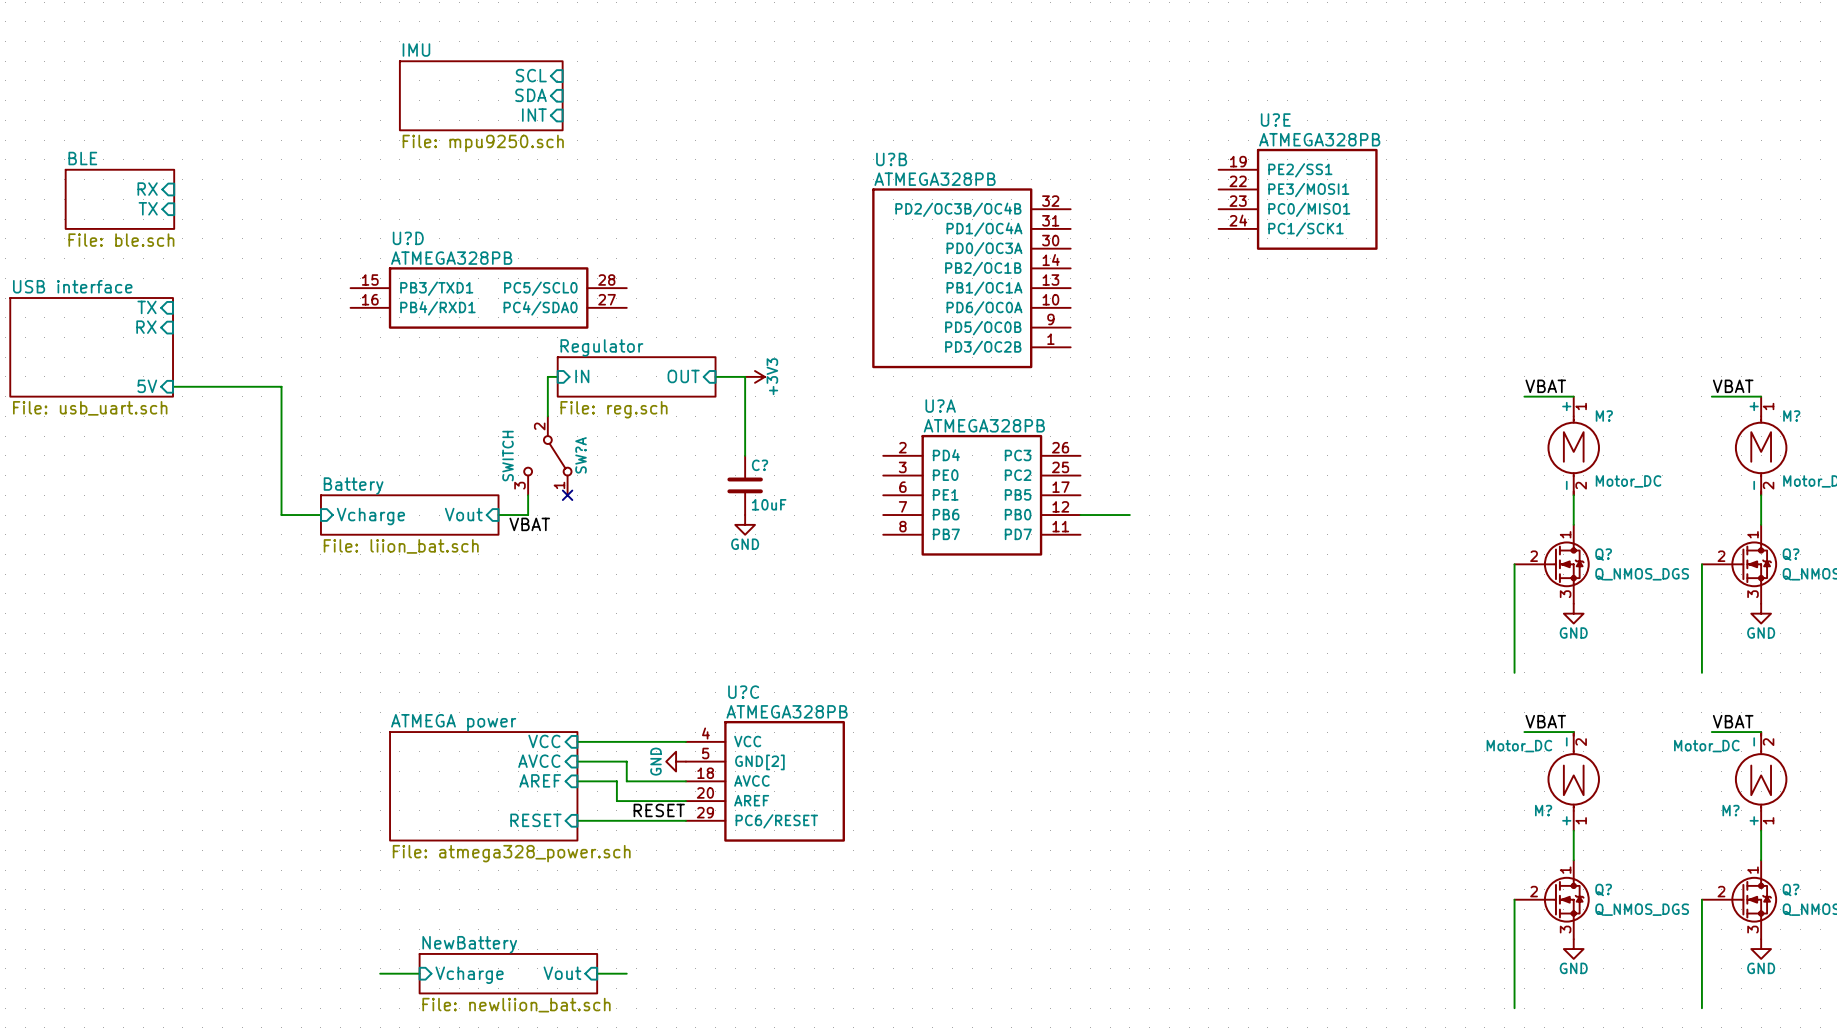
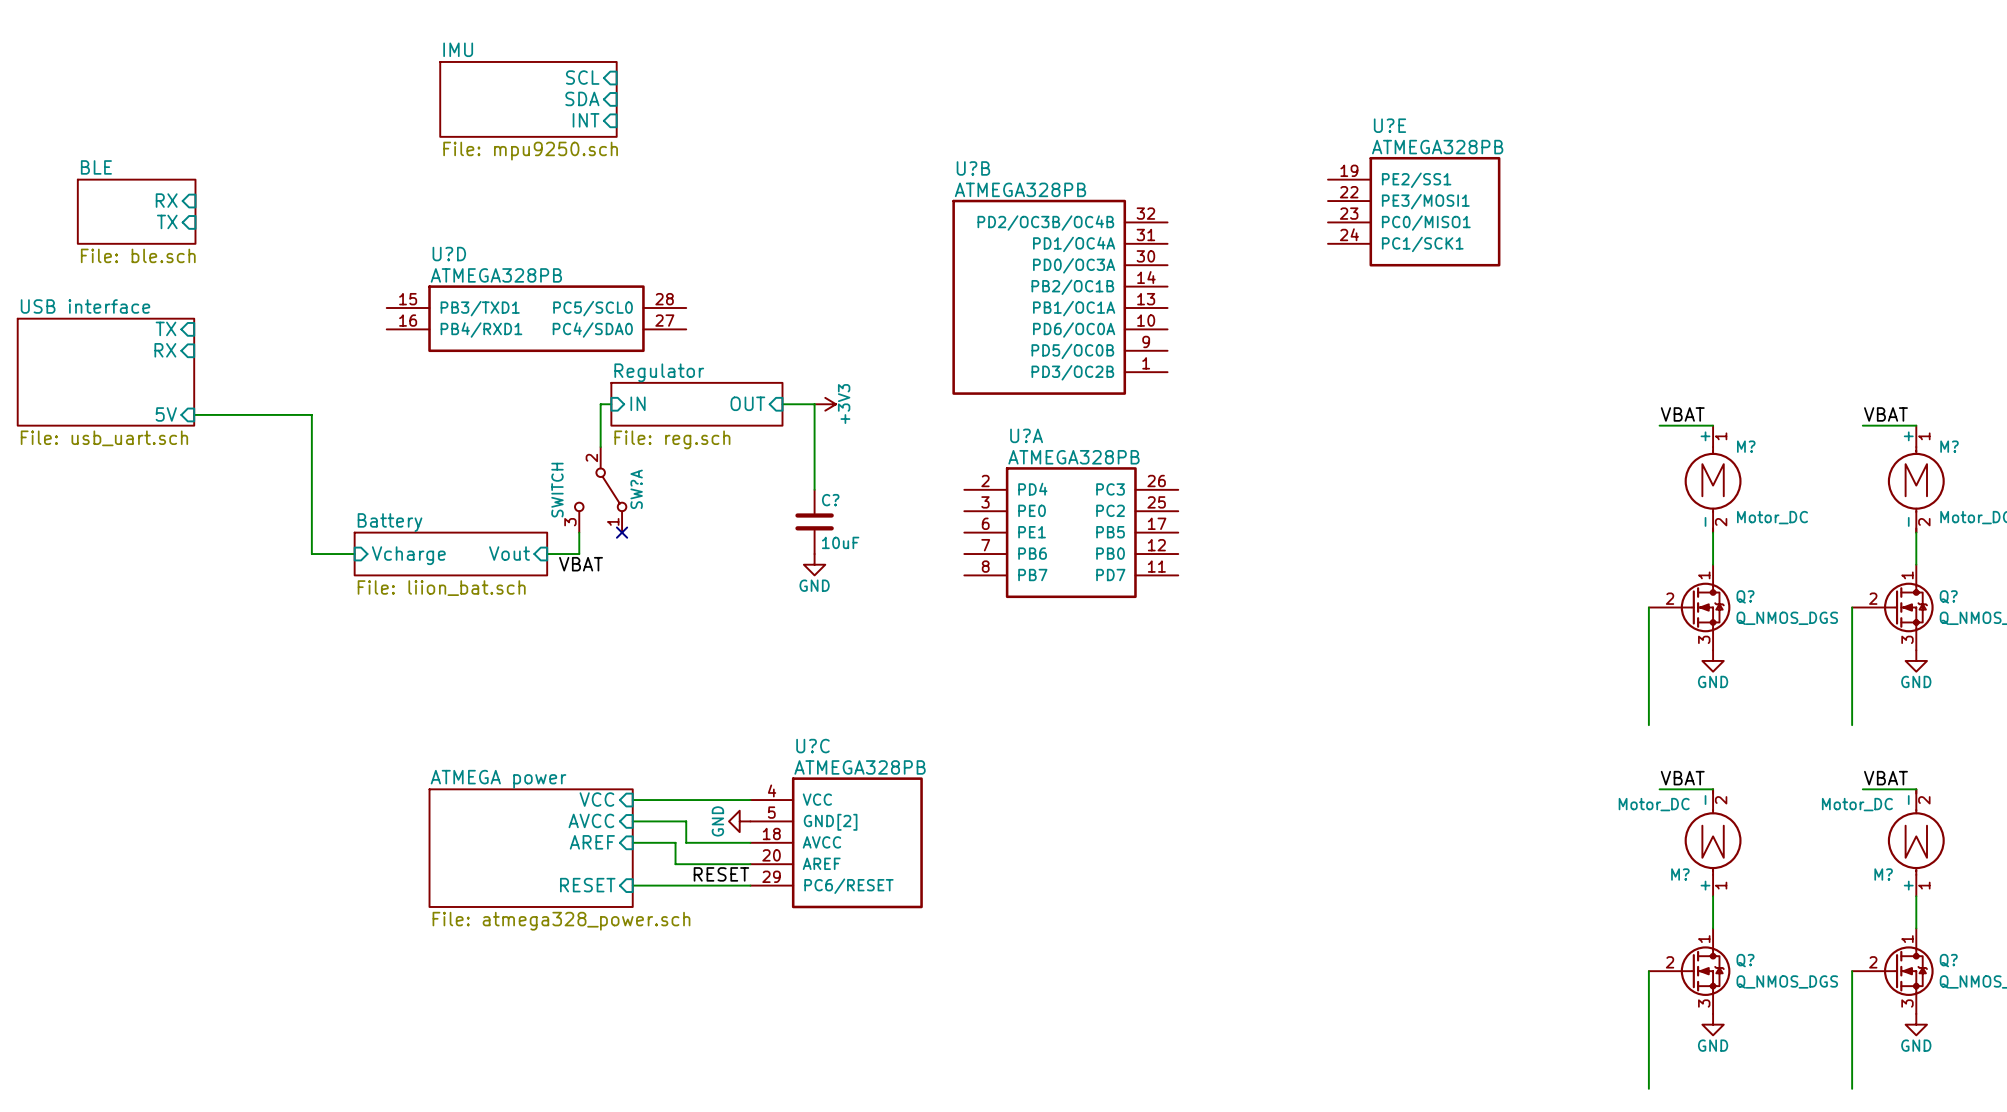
wire: (1080, 515) (1129, 515) -> none
wire: (380, 973) (419, 973) -> none
sheet NewBattery: File: newliion_bat.sch (508, 973) -> none
sheet pin: Vout (562, 973) -> none
wire: (597, 973) (626, 973) -> none
sheet pin: Vcharge (469, 975) -> none

